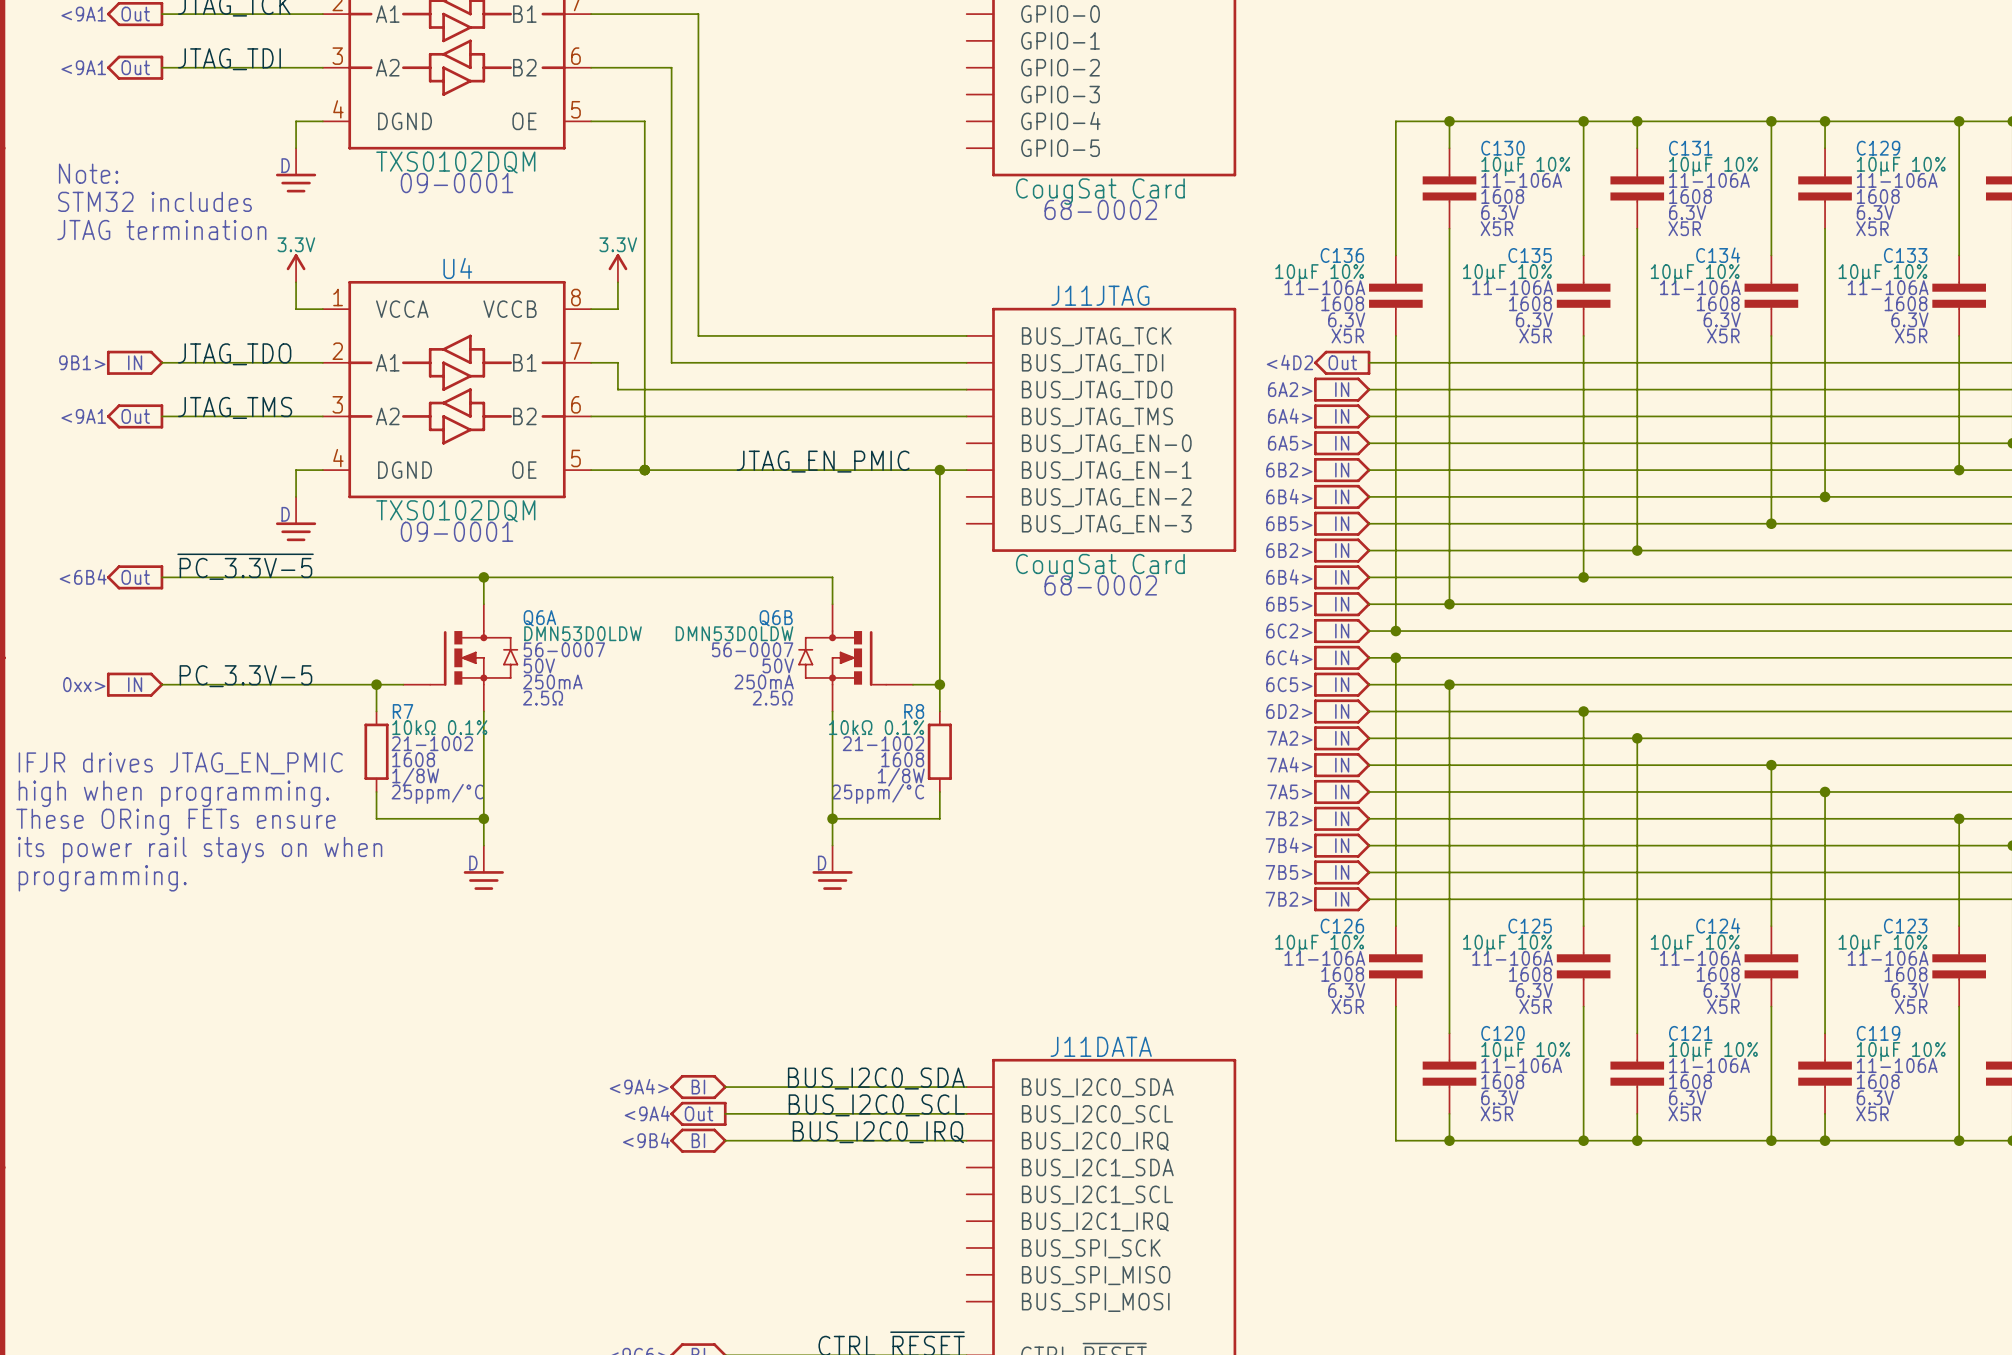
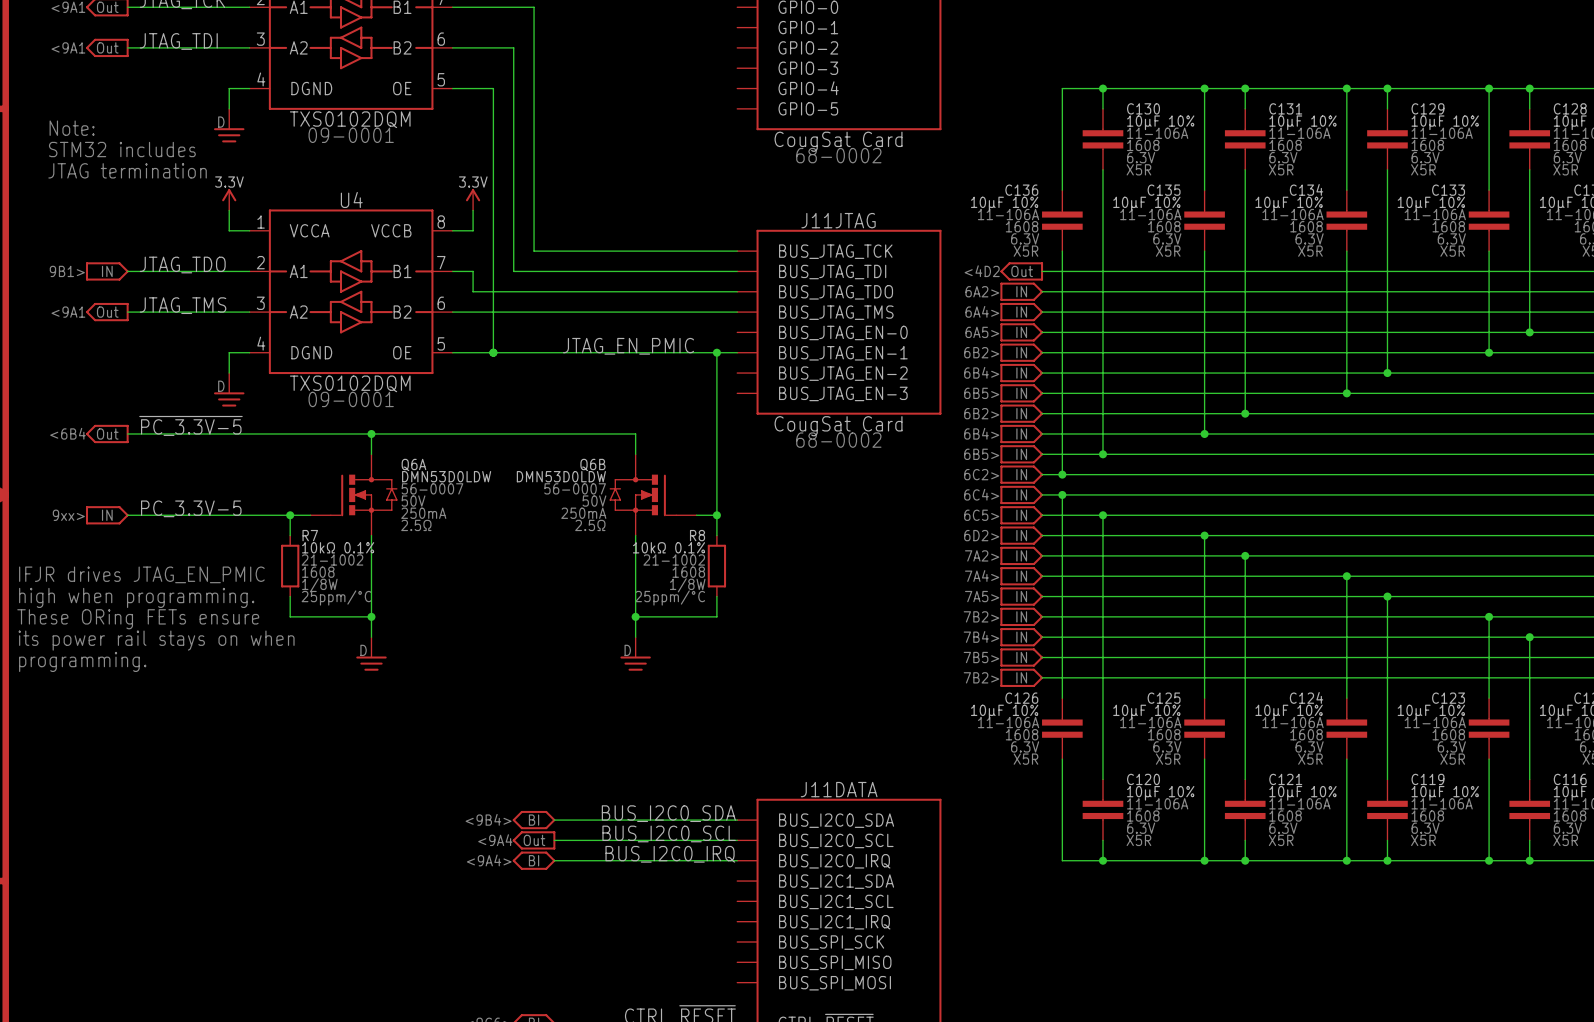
text: 0xx> (84, 684) -> 9xx> (68, 515)
text: <9A4> (639, 1086) -> <9B4> (488, 819)
text: <9B4 (646, 1140) -> <9A4> (489, 860)

